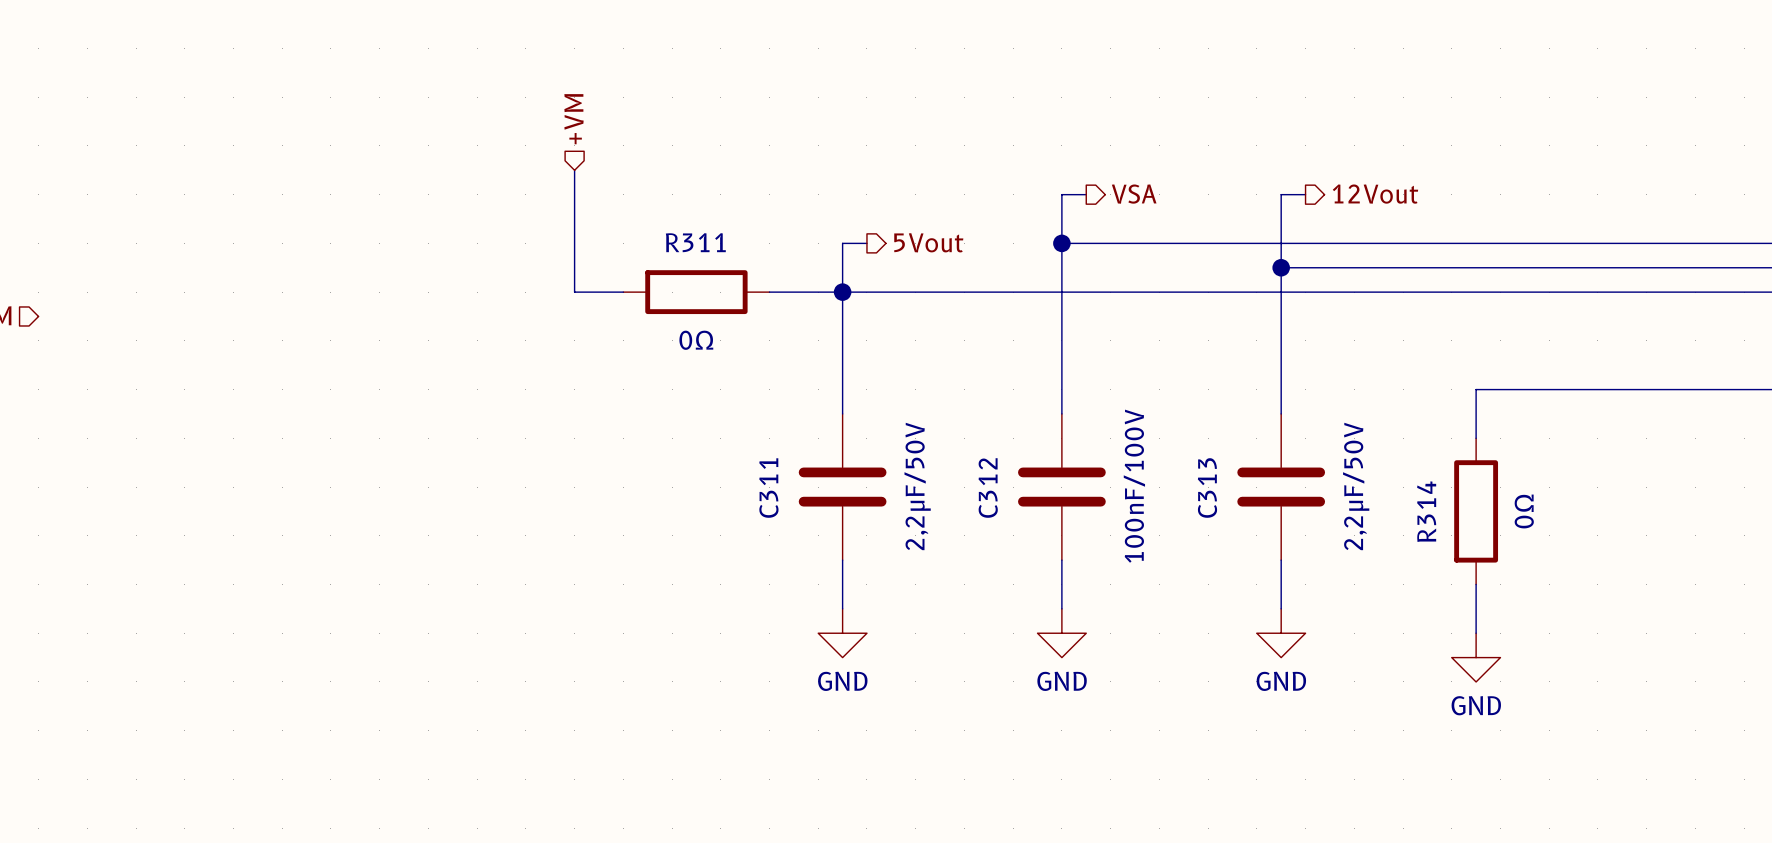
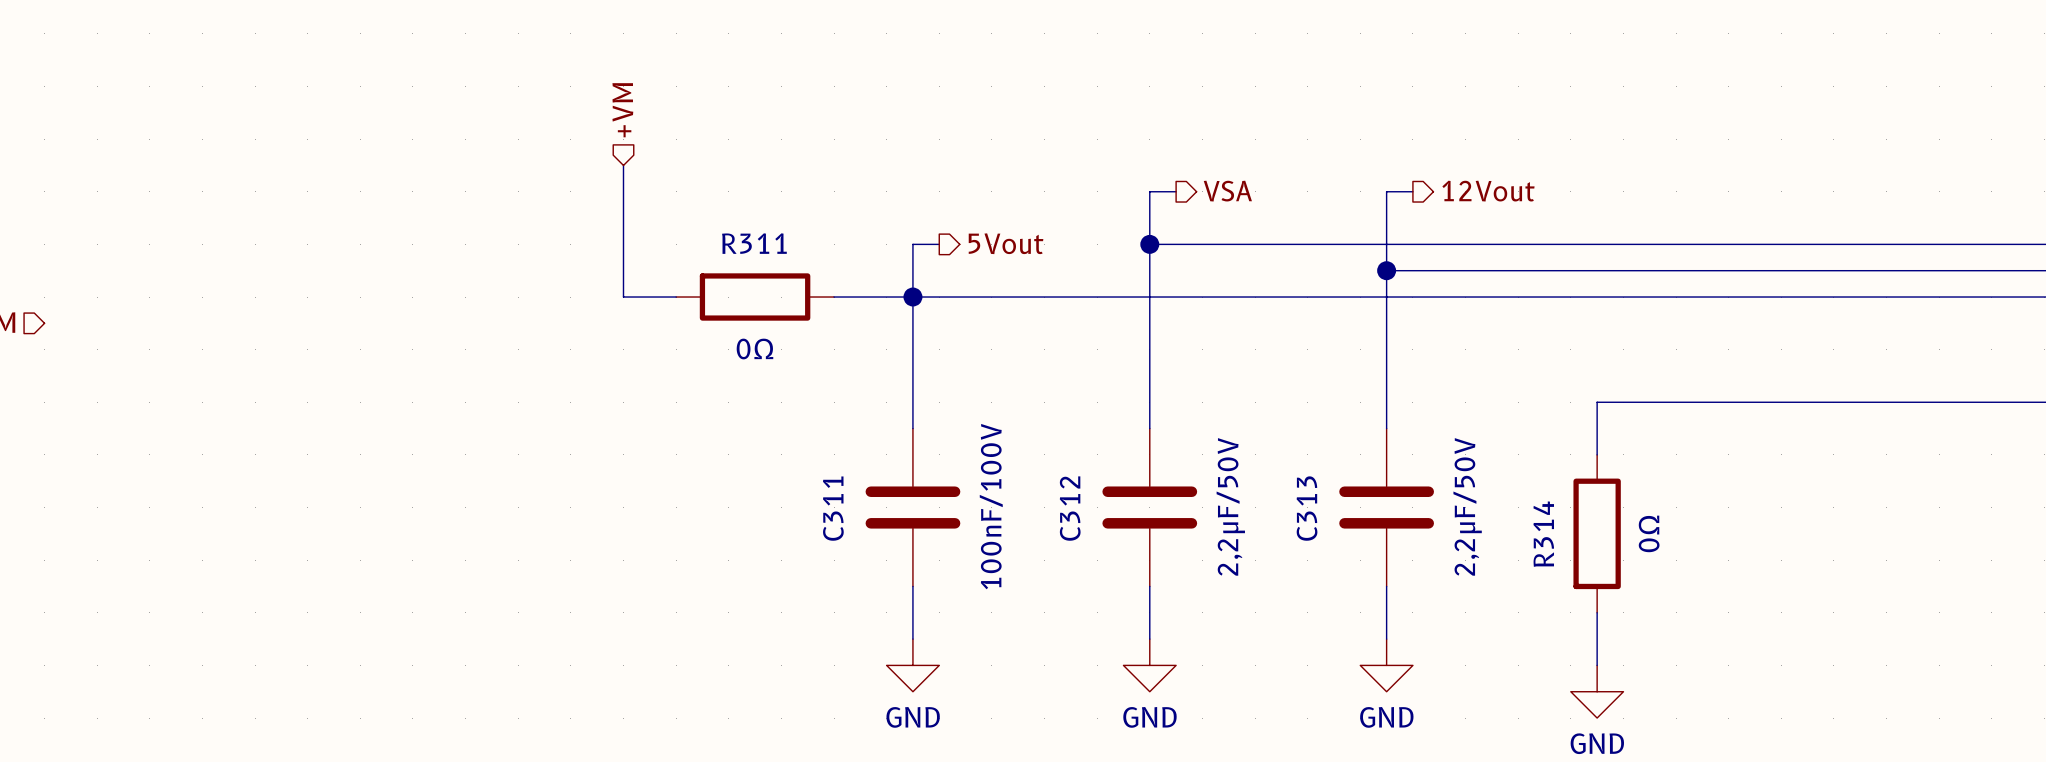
C311 value: 2,2μF/50V (917, 486) -> 100nF/100V (991, 506)
C312 value: 100nF/100V (1134, 486) -> 2,2μF/50V (1230, 506)

